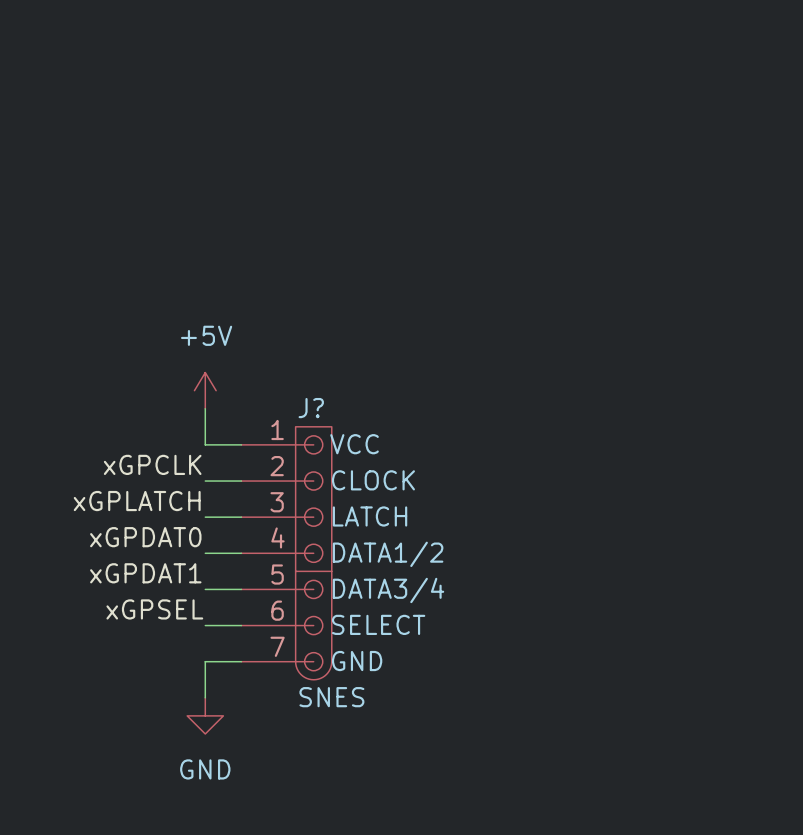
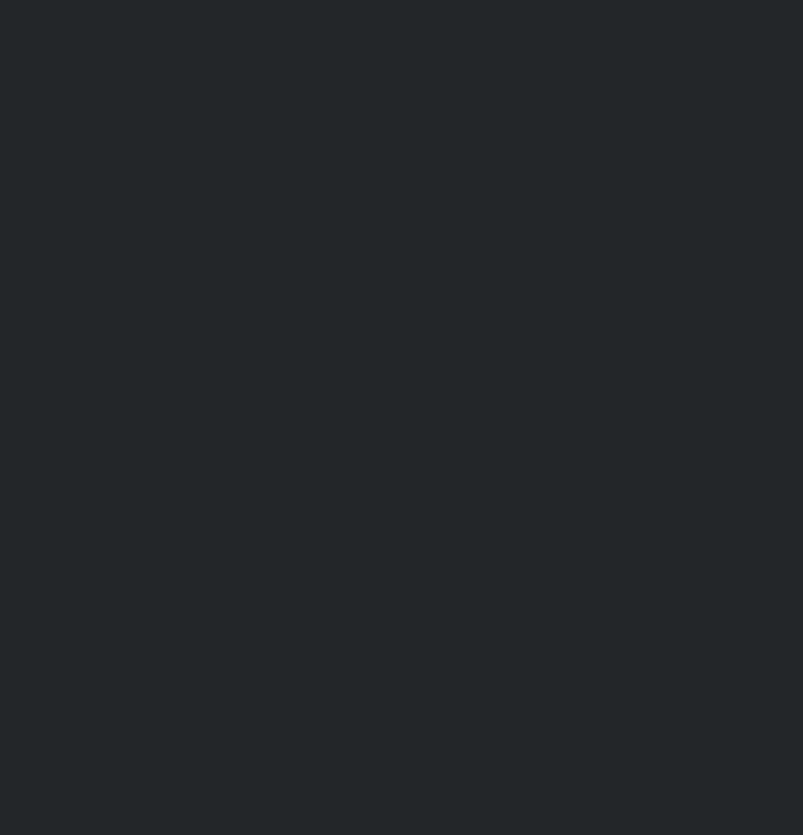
power symbol: +5V (205, 390) -> none
wire: (205, 408) (205, 444) (241, 444) -> none
label: xGPCLK (152, 464) -> none
wire: (205, 481) (241, 481) -> none
label: xGPLATCH (137, 501) -> none
wire: (205, 517) (241, 517) -> none
label: xGPDAT0 (145, 537) -> none
wire: (205, 553) (241, 553) -> none
J?: SNES (286, 553) -> none
label: xGPDAT1 (145, 573) -> none
wire: (205, 589) (241, 589) -> none
label: xGPSEL (154, 609) -> none
wire: (205, 625) (241, 625) -> none
wire: (241, 661) (205, 661) (205, 697) -> none
power symbol: GND (205, 715) -> none

